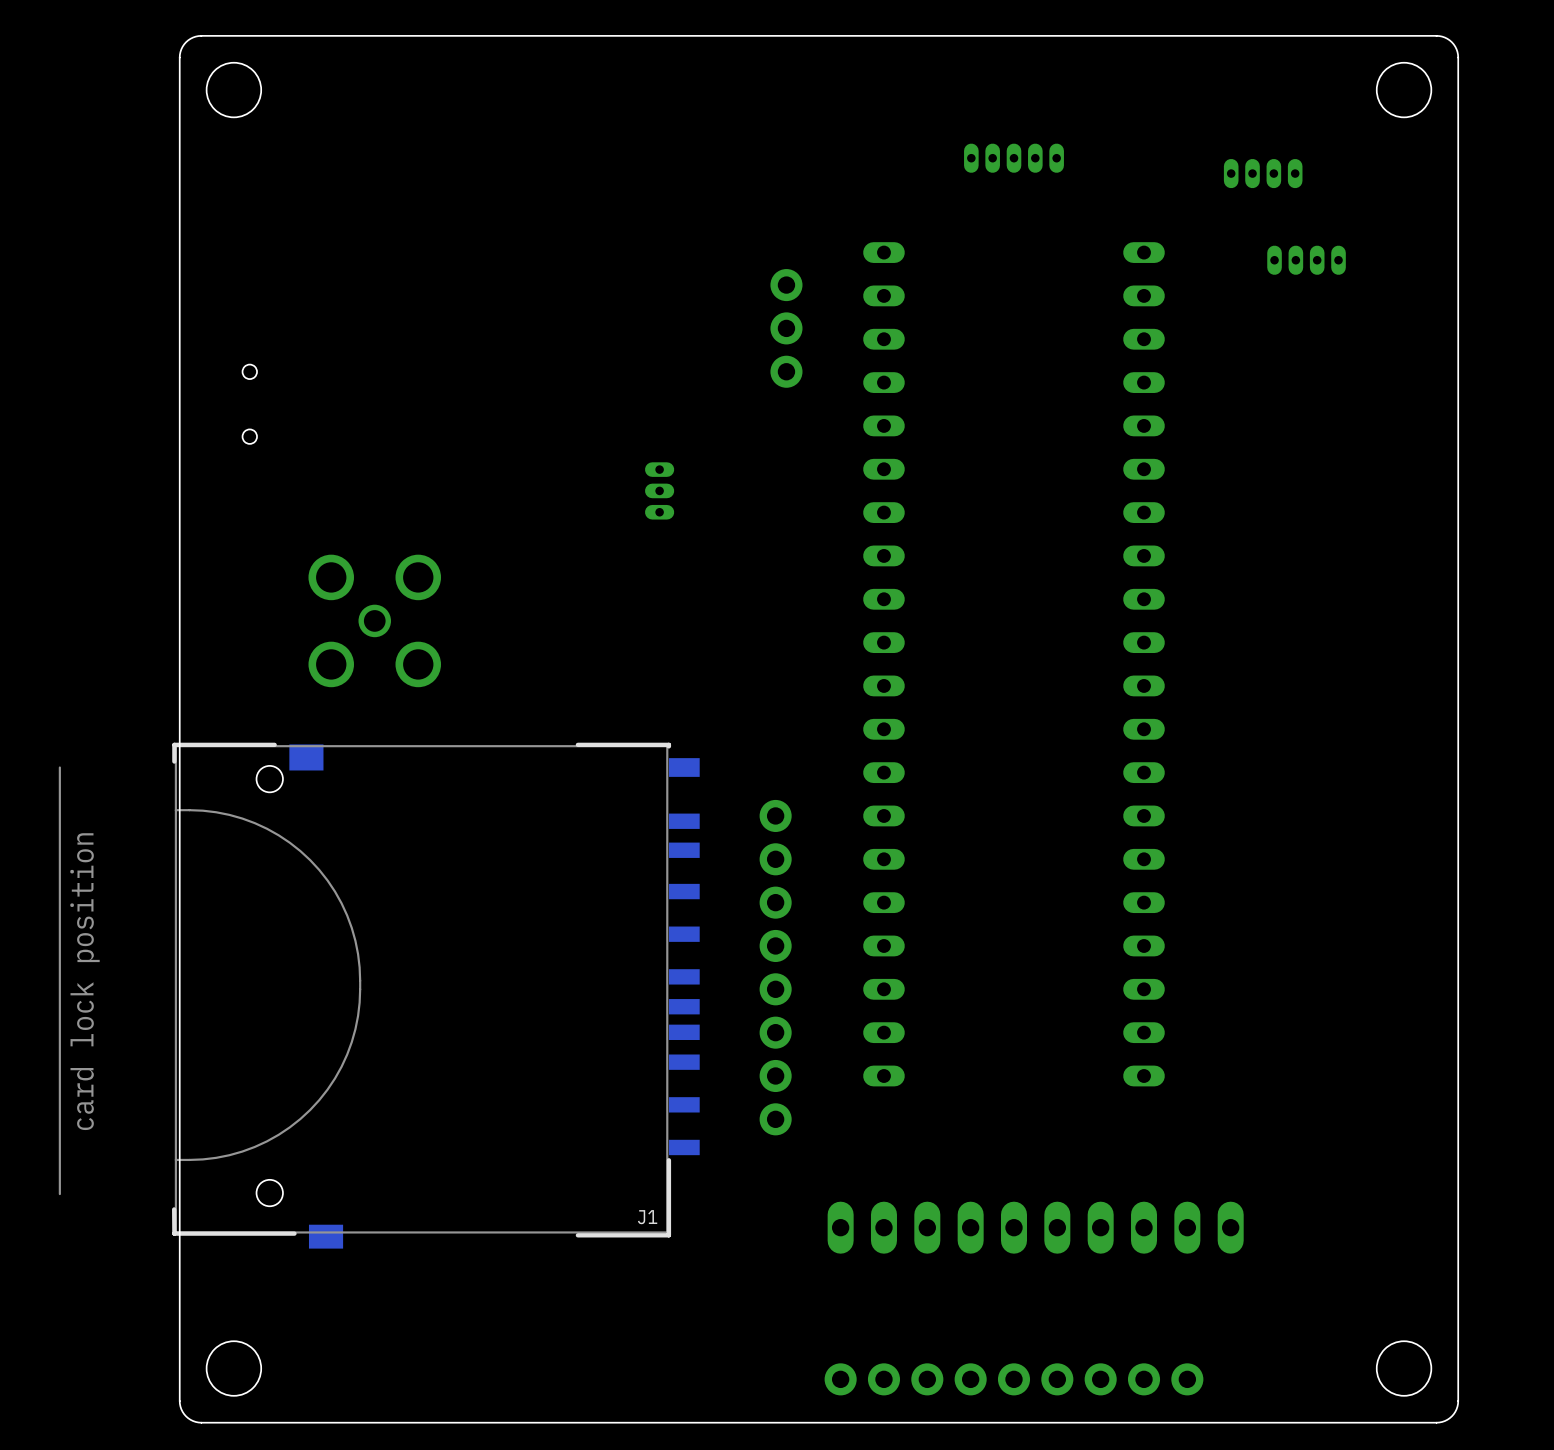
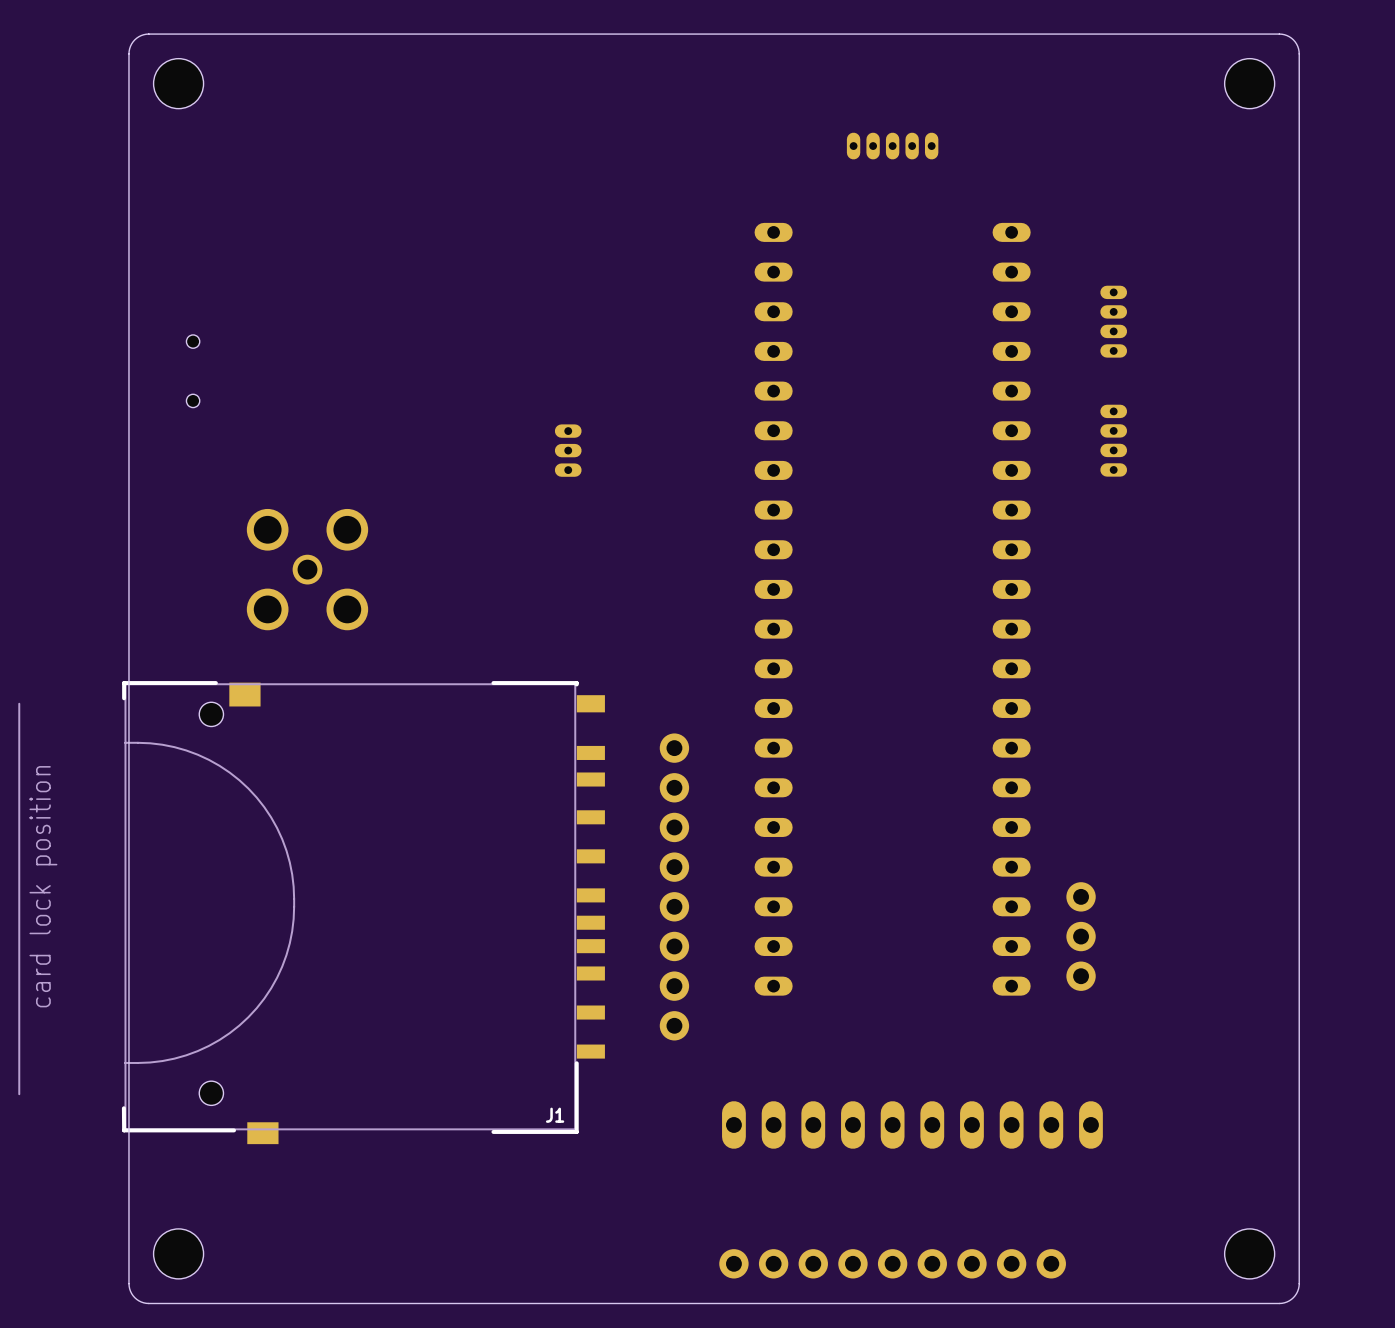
part: (1263, 173) -> none
part: (1306, 260) -> none
part: (786, 328) -> none
part: none -> (1113, 321)
part: none -> (1113, 440)
part: none -> (1081, 936)

